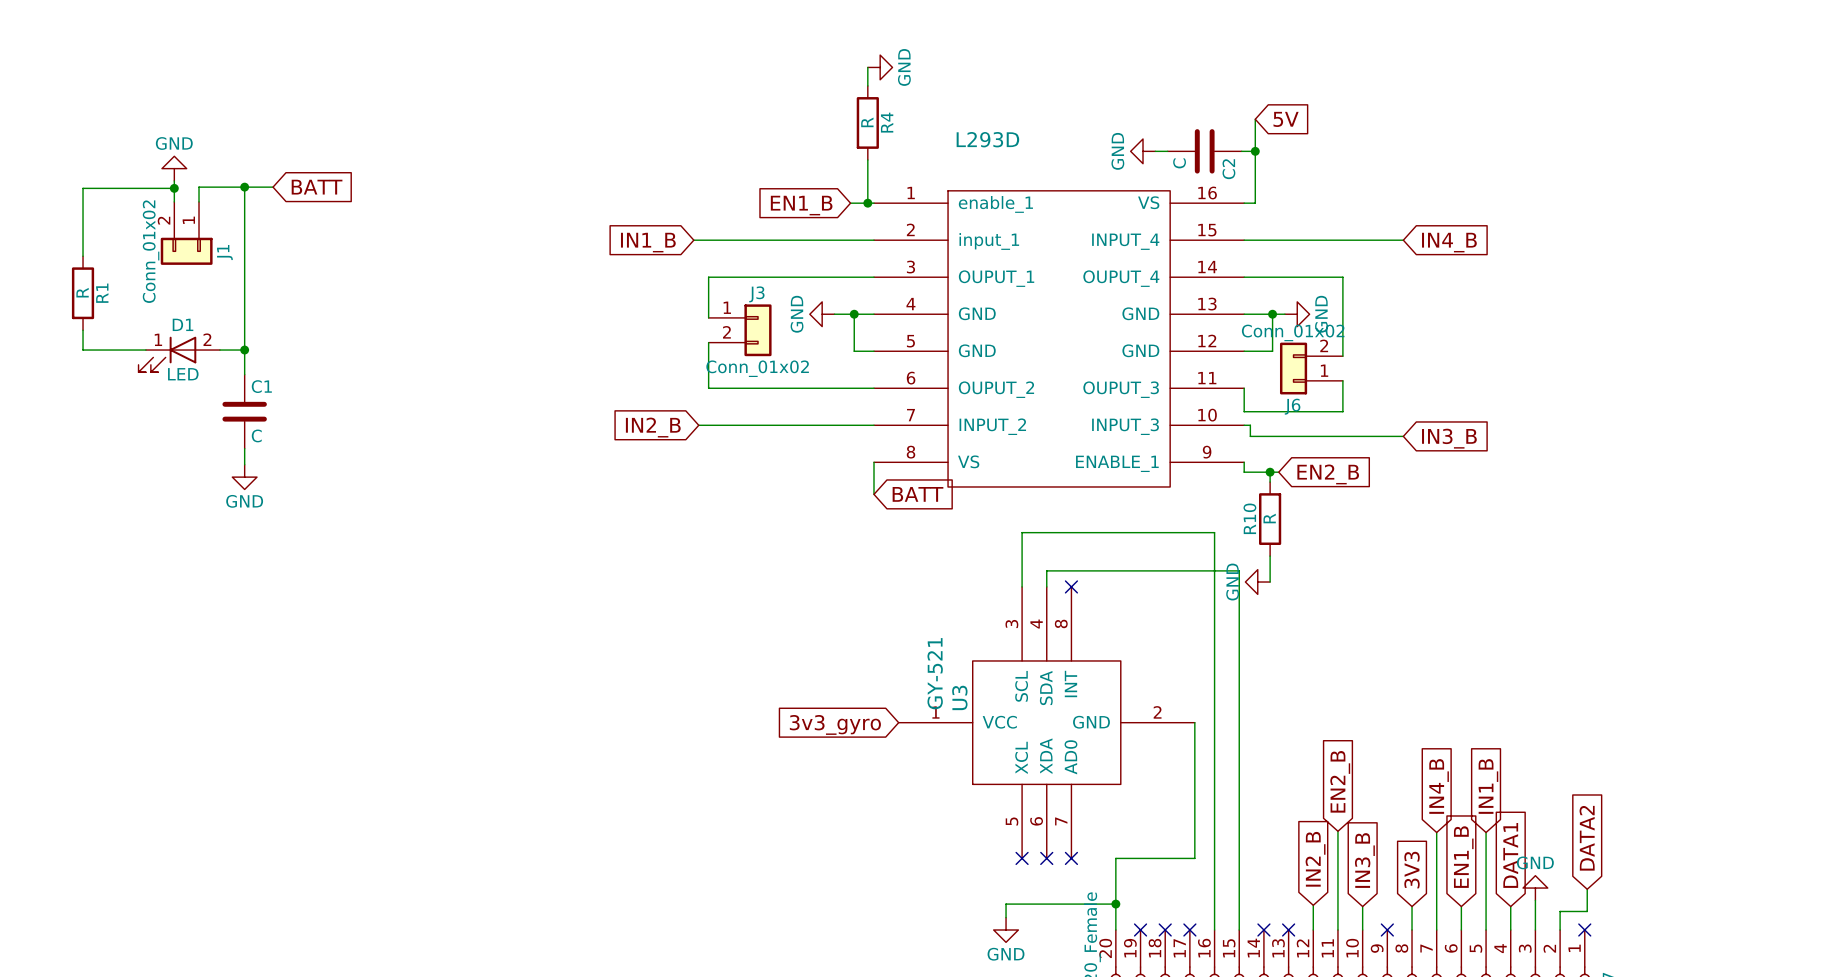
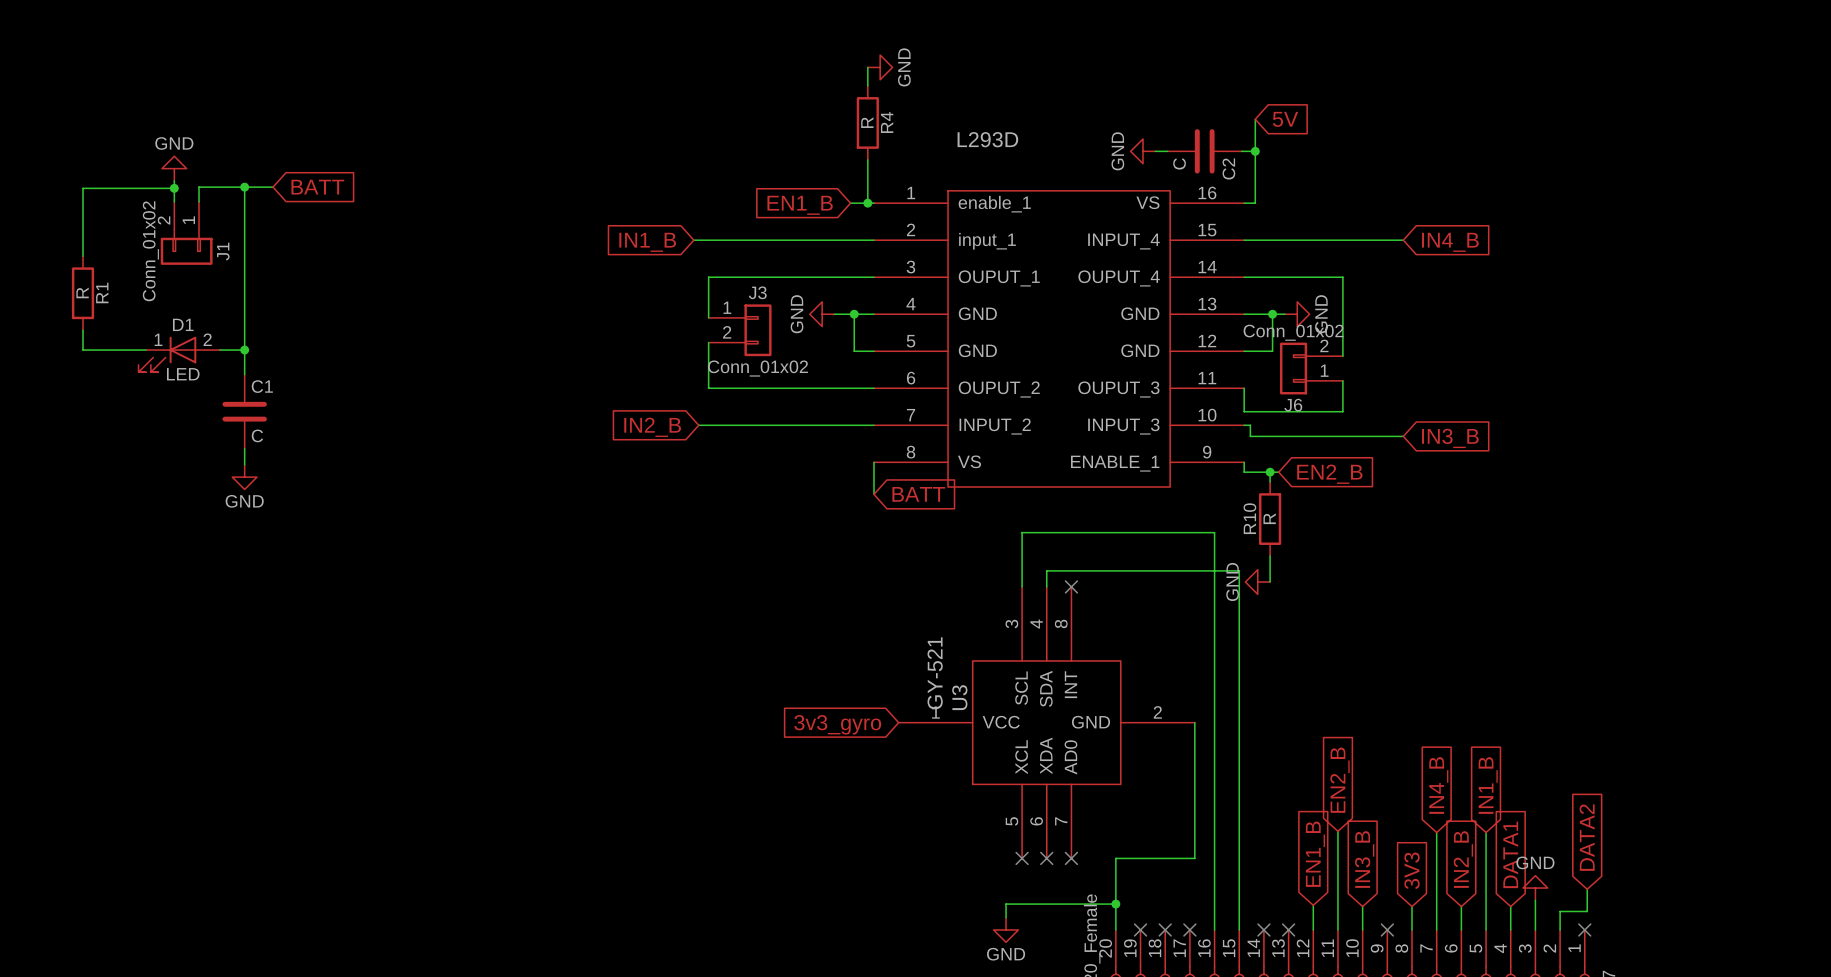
global label: EN1_B (1463, 857) -> IN2_B (1463, 859)
global label: IN2_B (1315, 859) -> EN1_B (1315, 854)

